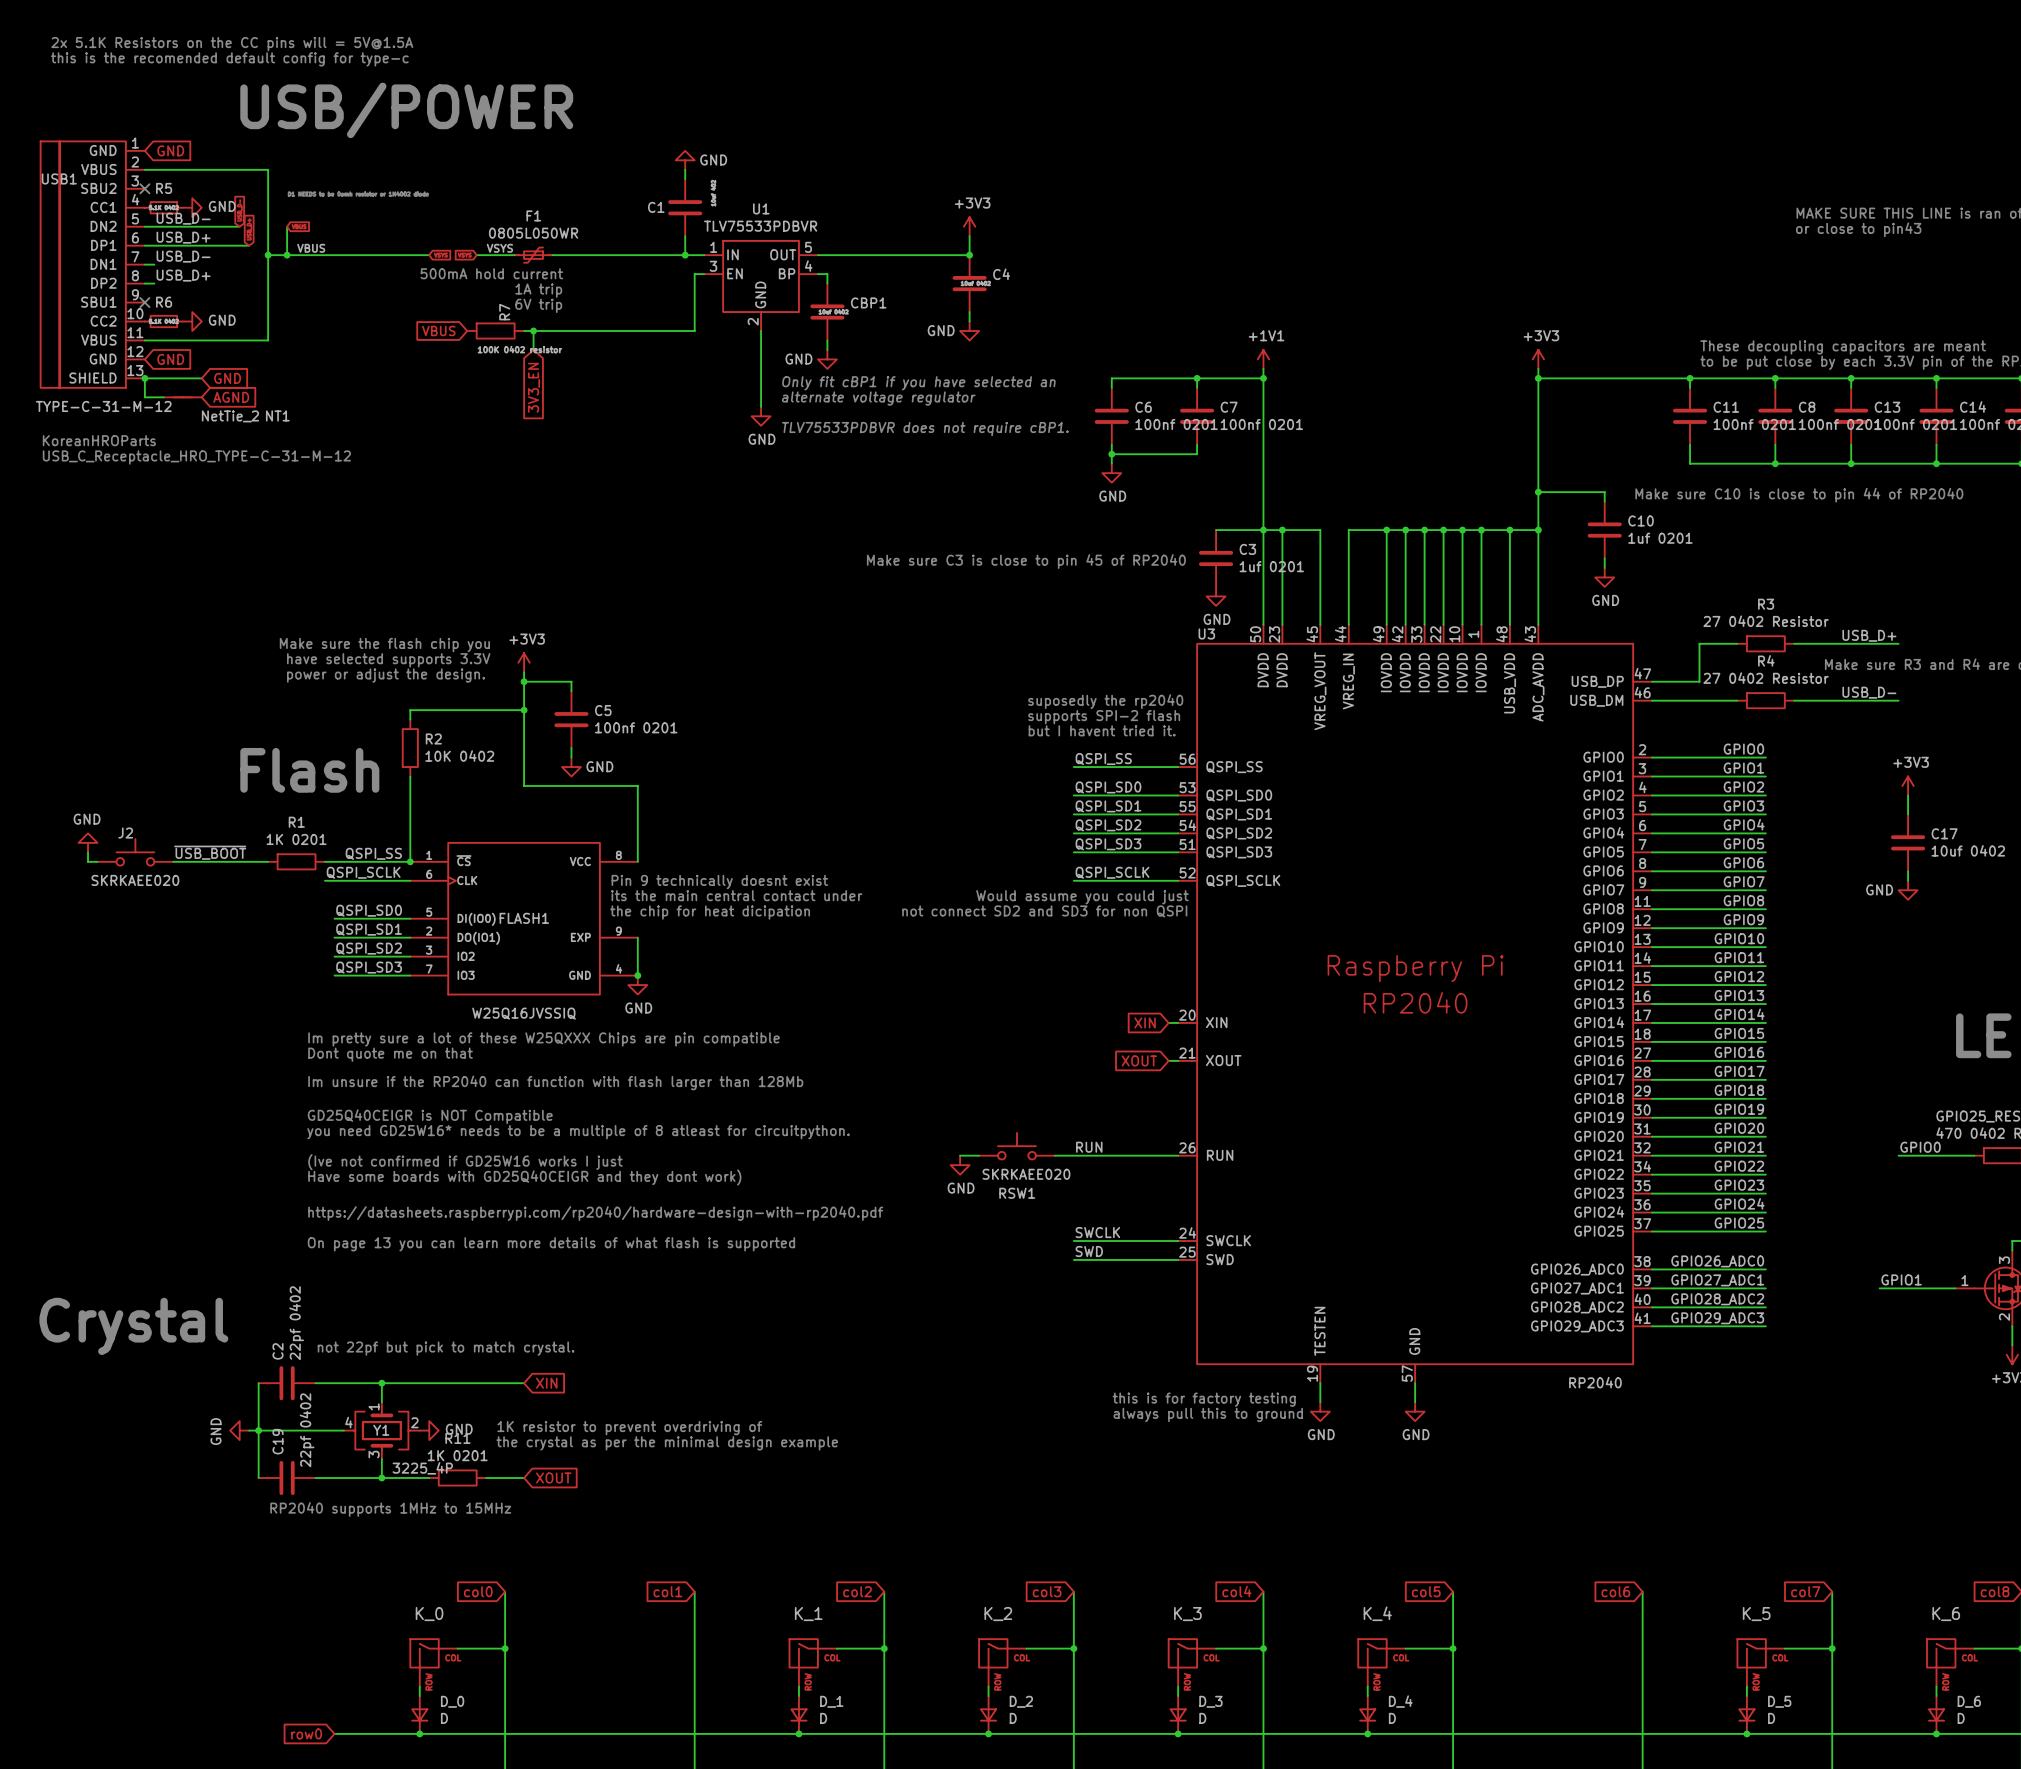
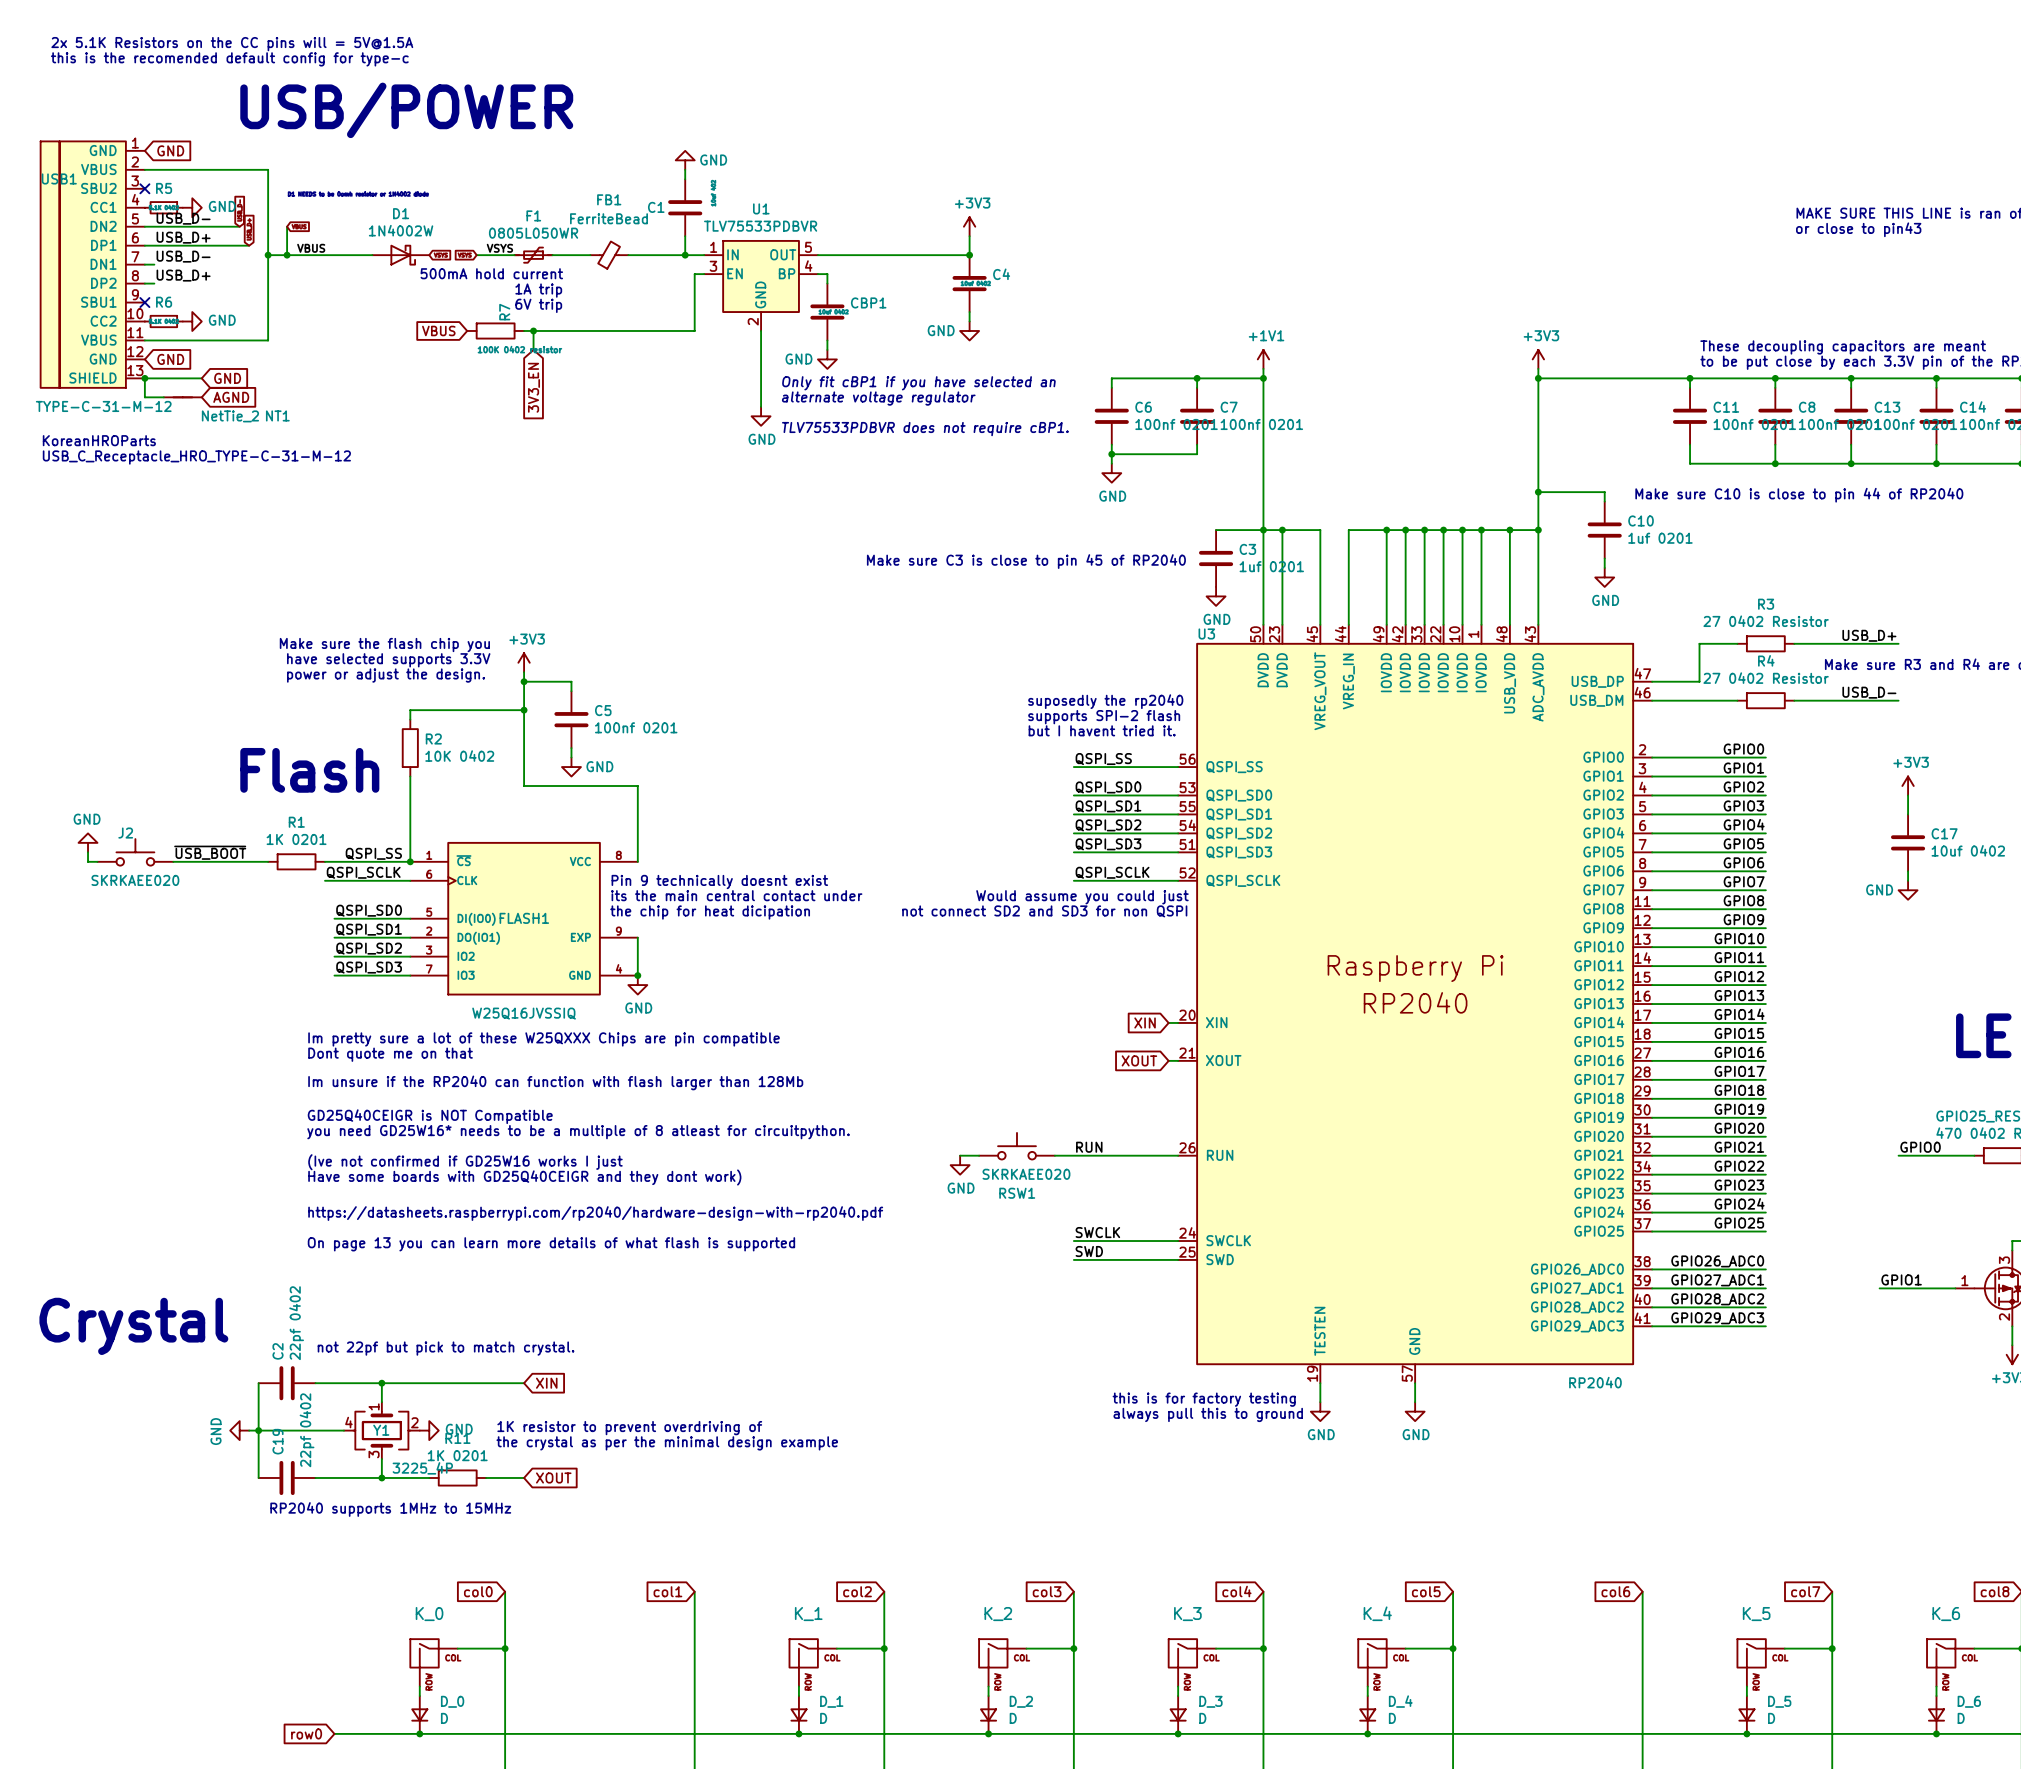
D1: none -> 1N4002W (400, 255)
FB1: none -> FerriteBead (609, 255)

